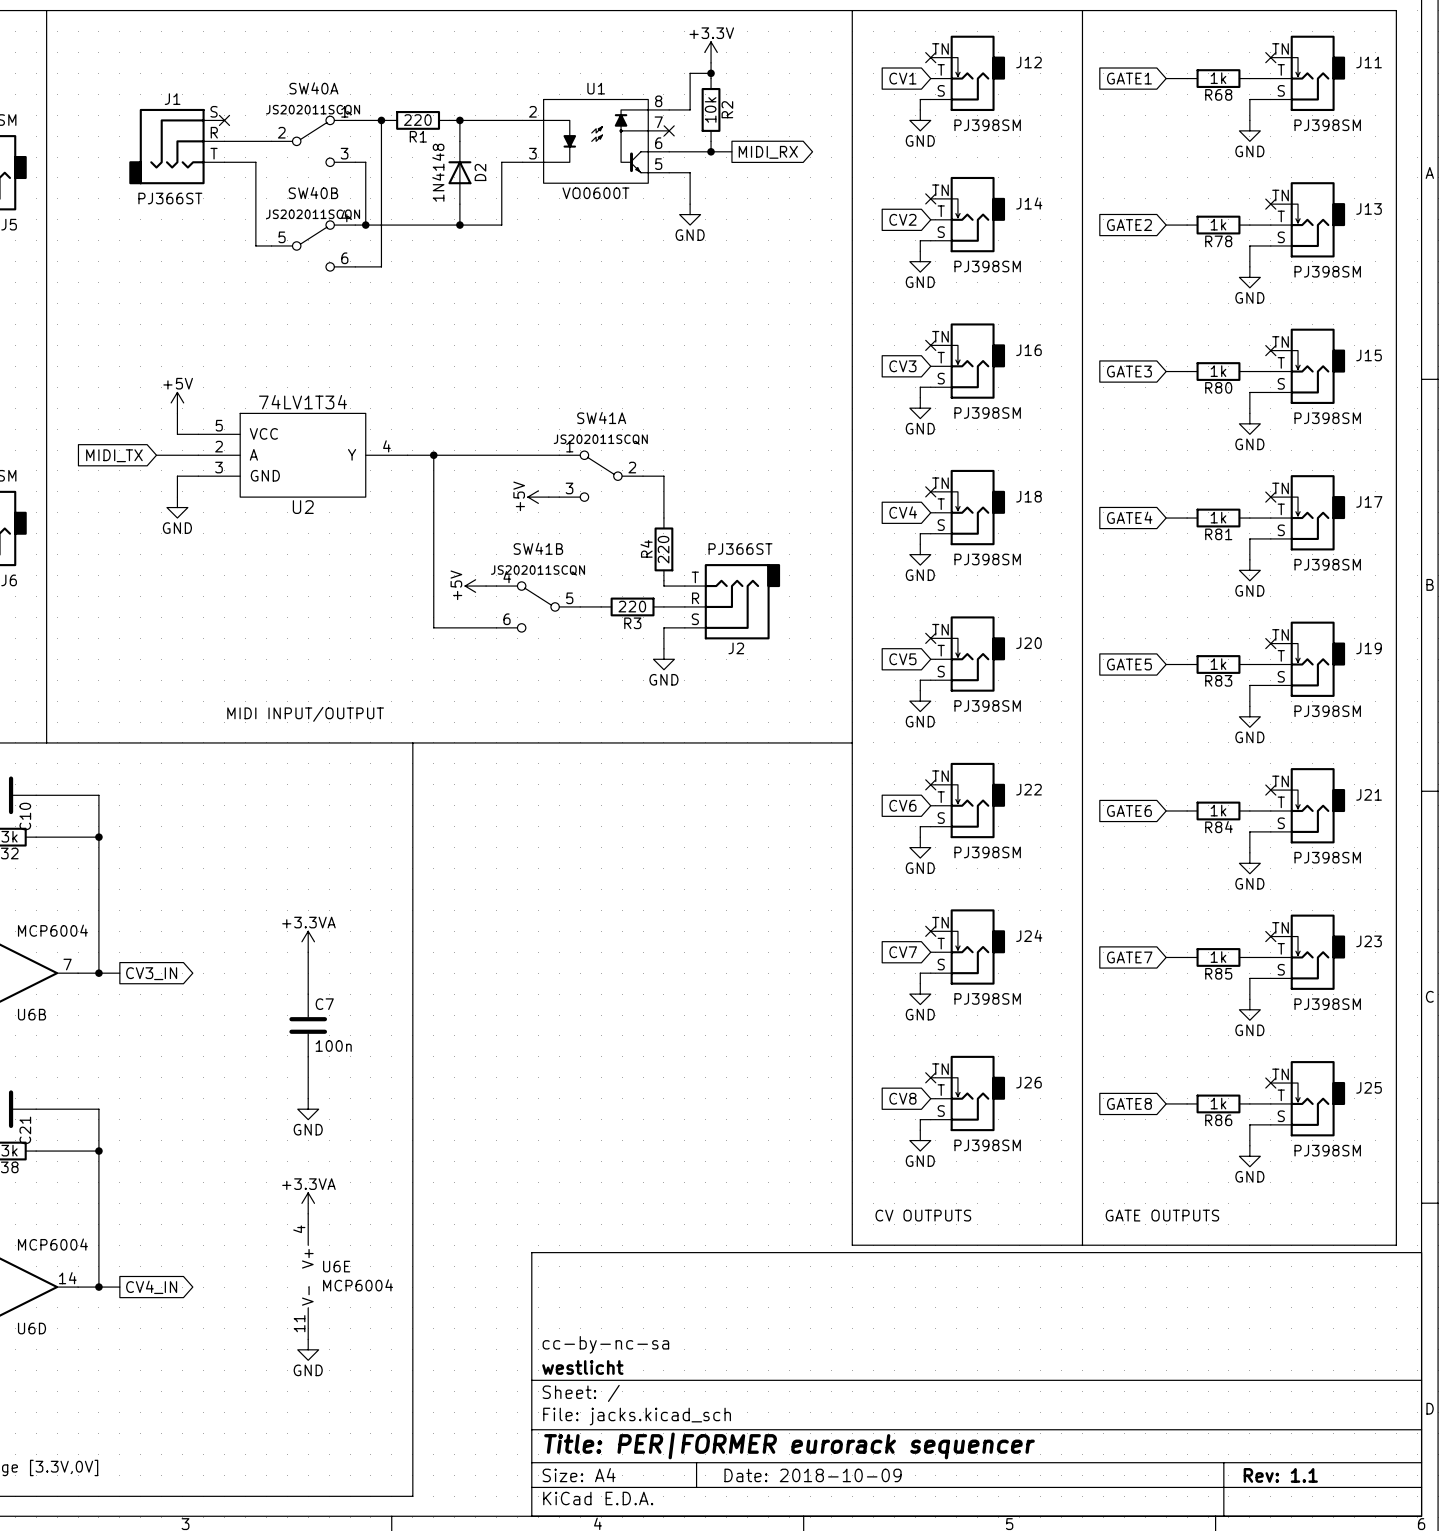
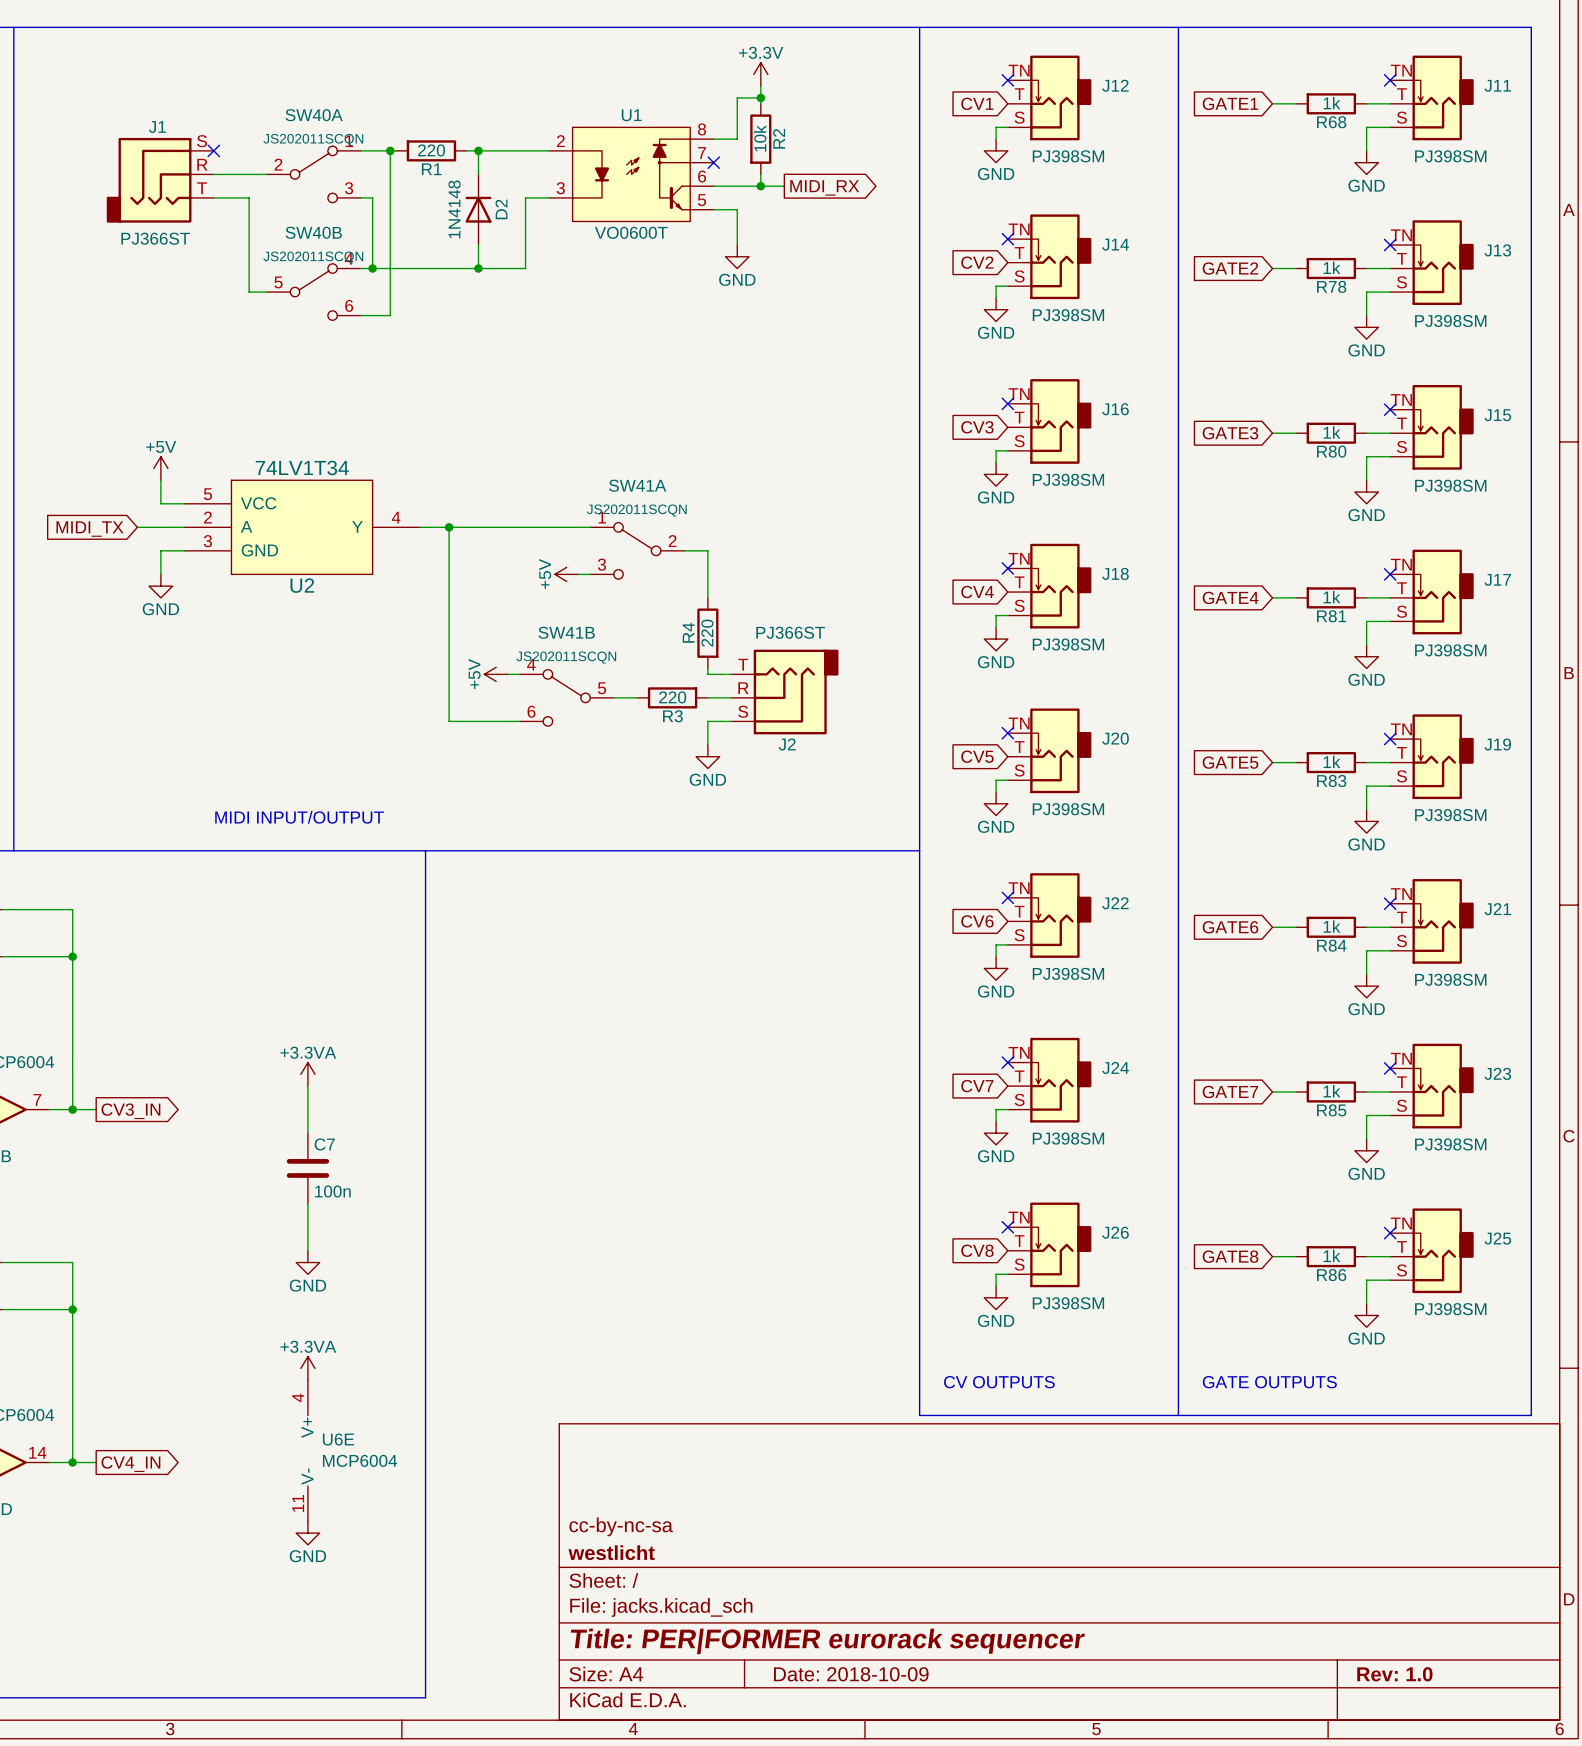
title block: Rev: 1.1 (1280, 1475) -> Rev: 1.0 (1394, 1674)

